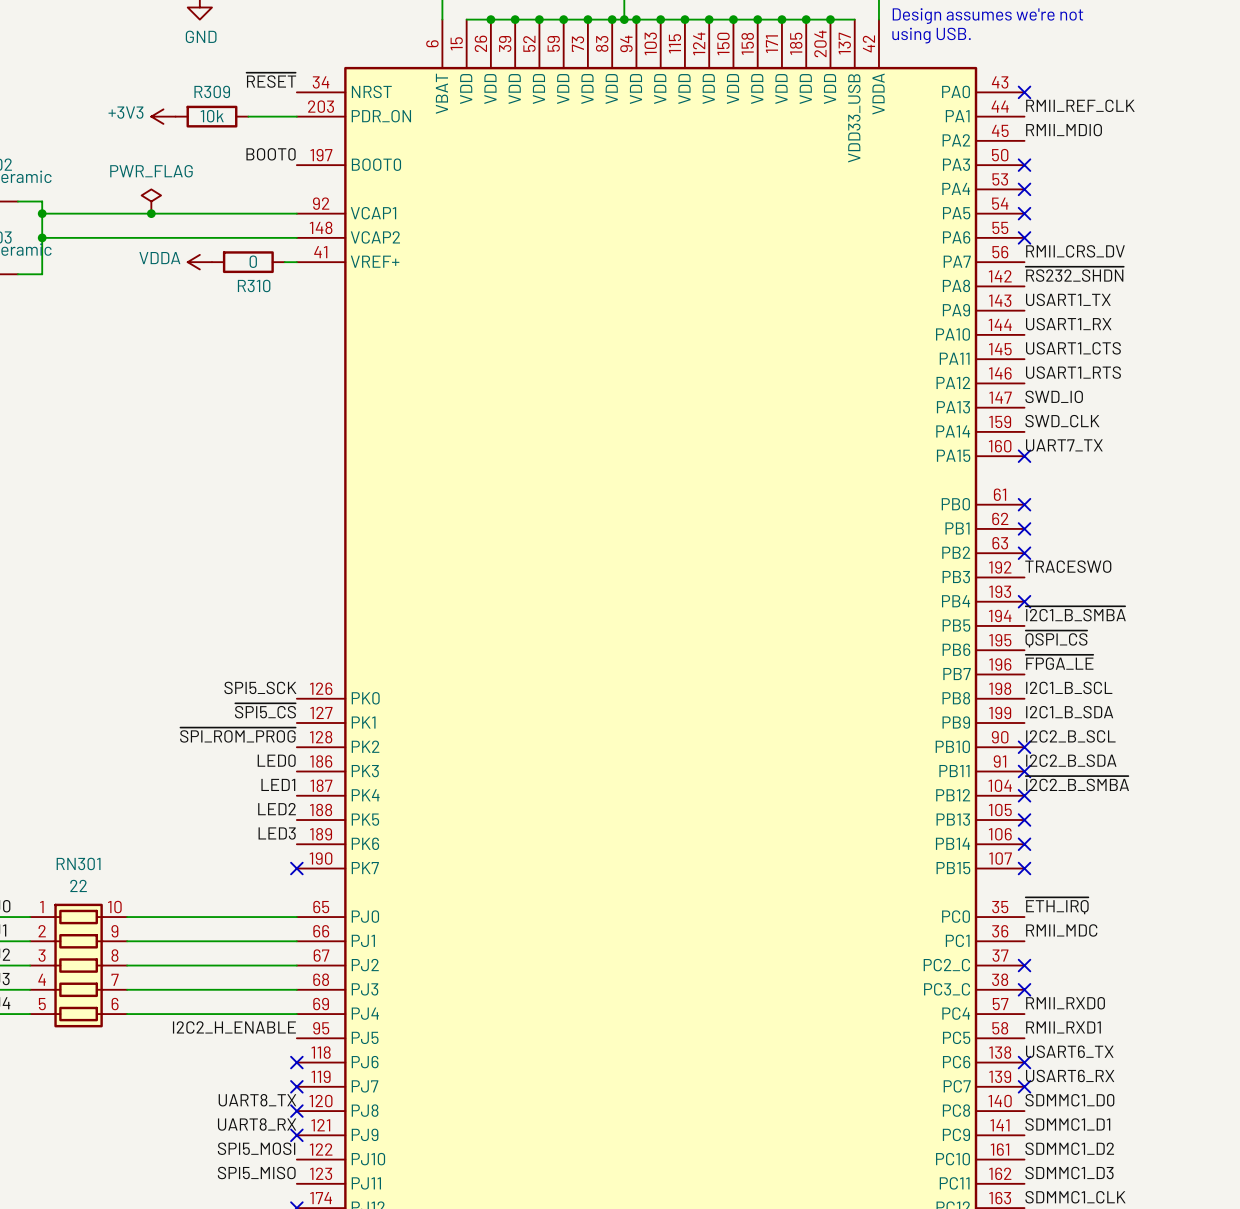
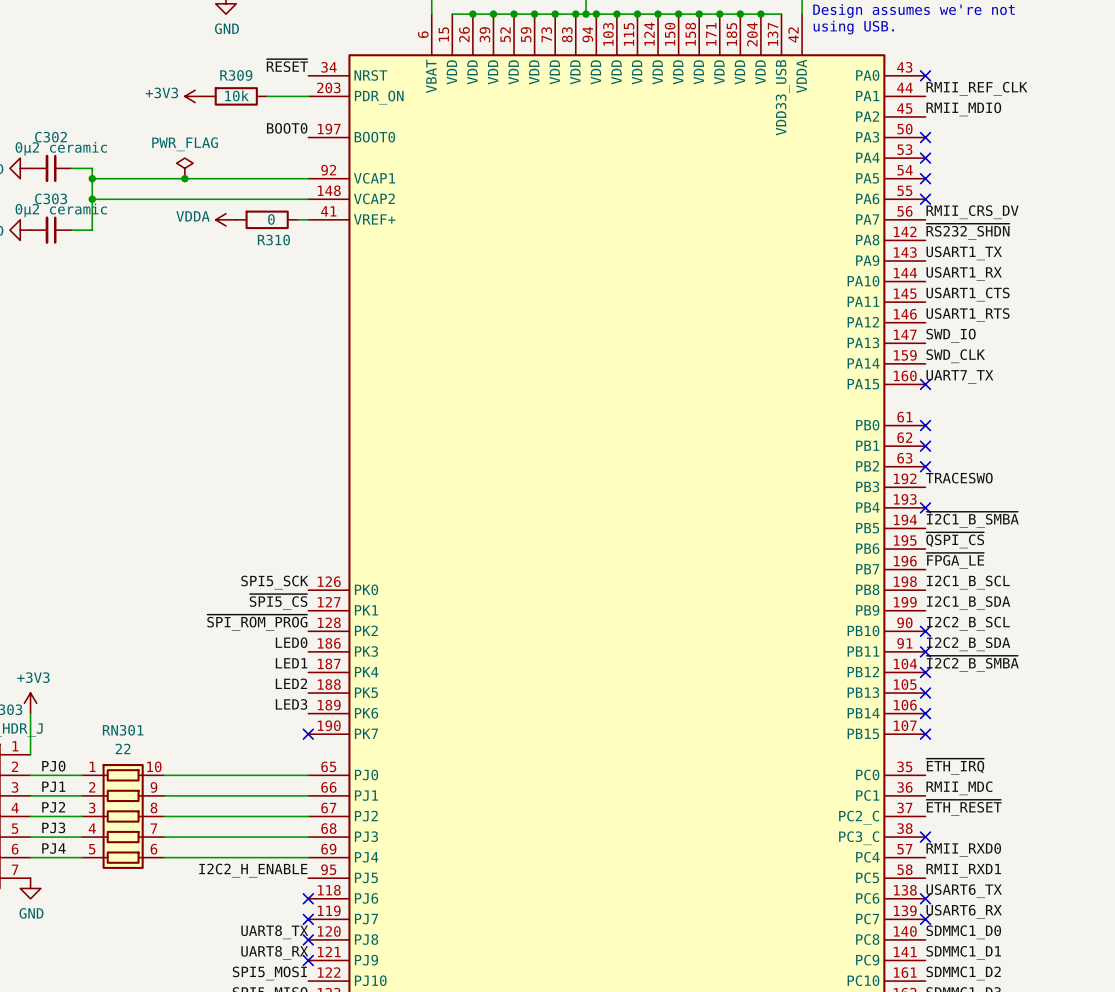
label: none -> ~{ETH_RESET} (964, 807)
no-connect mark: (1024, 965) -> none

